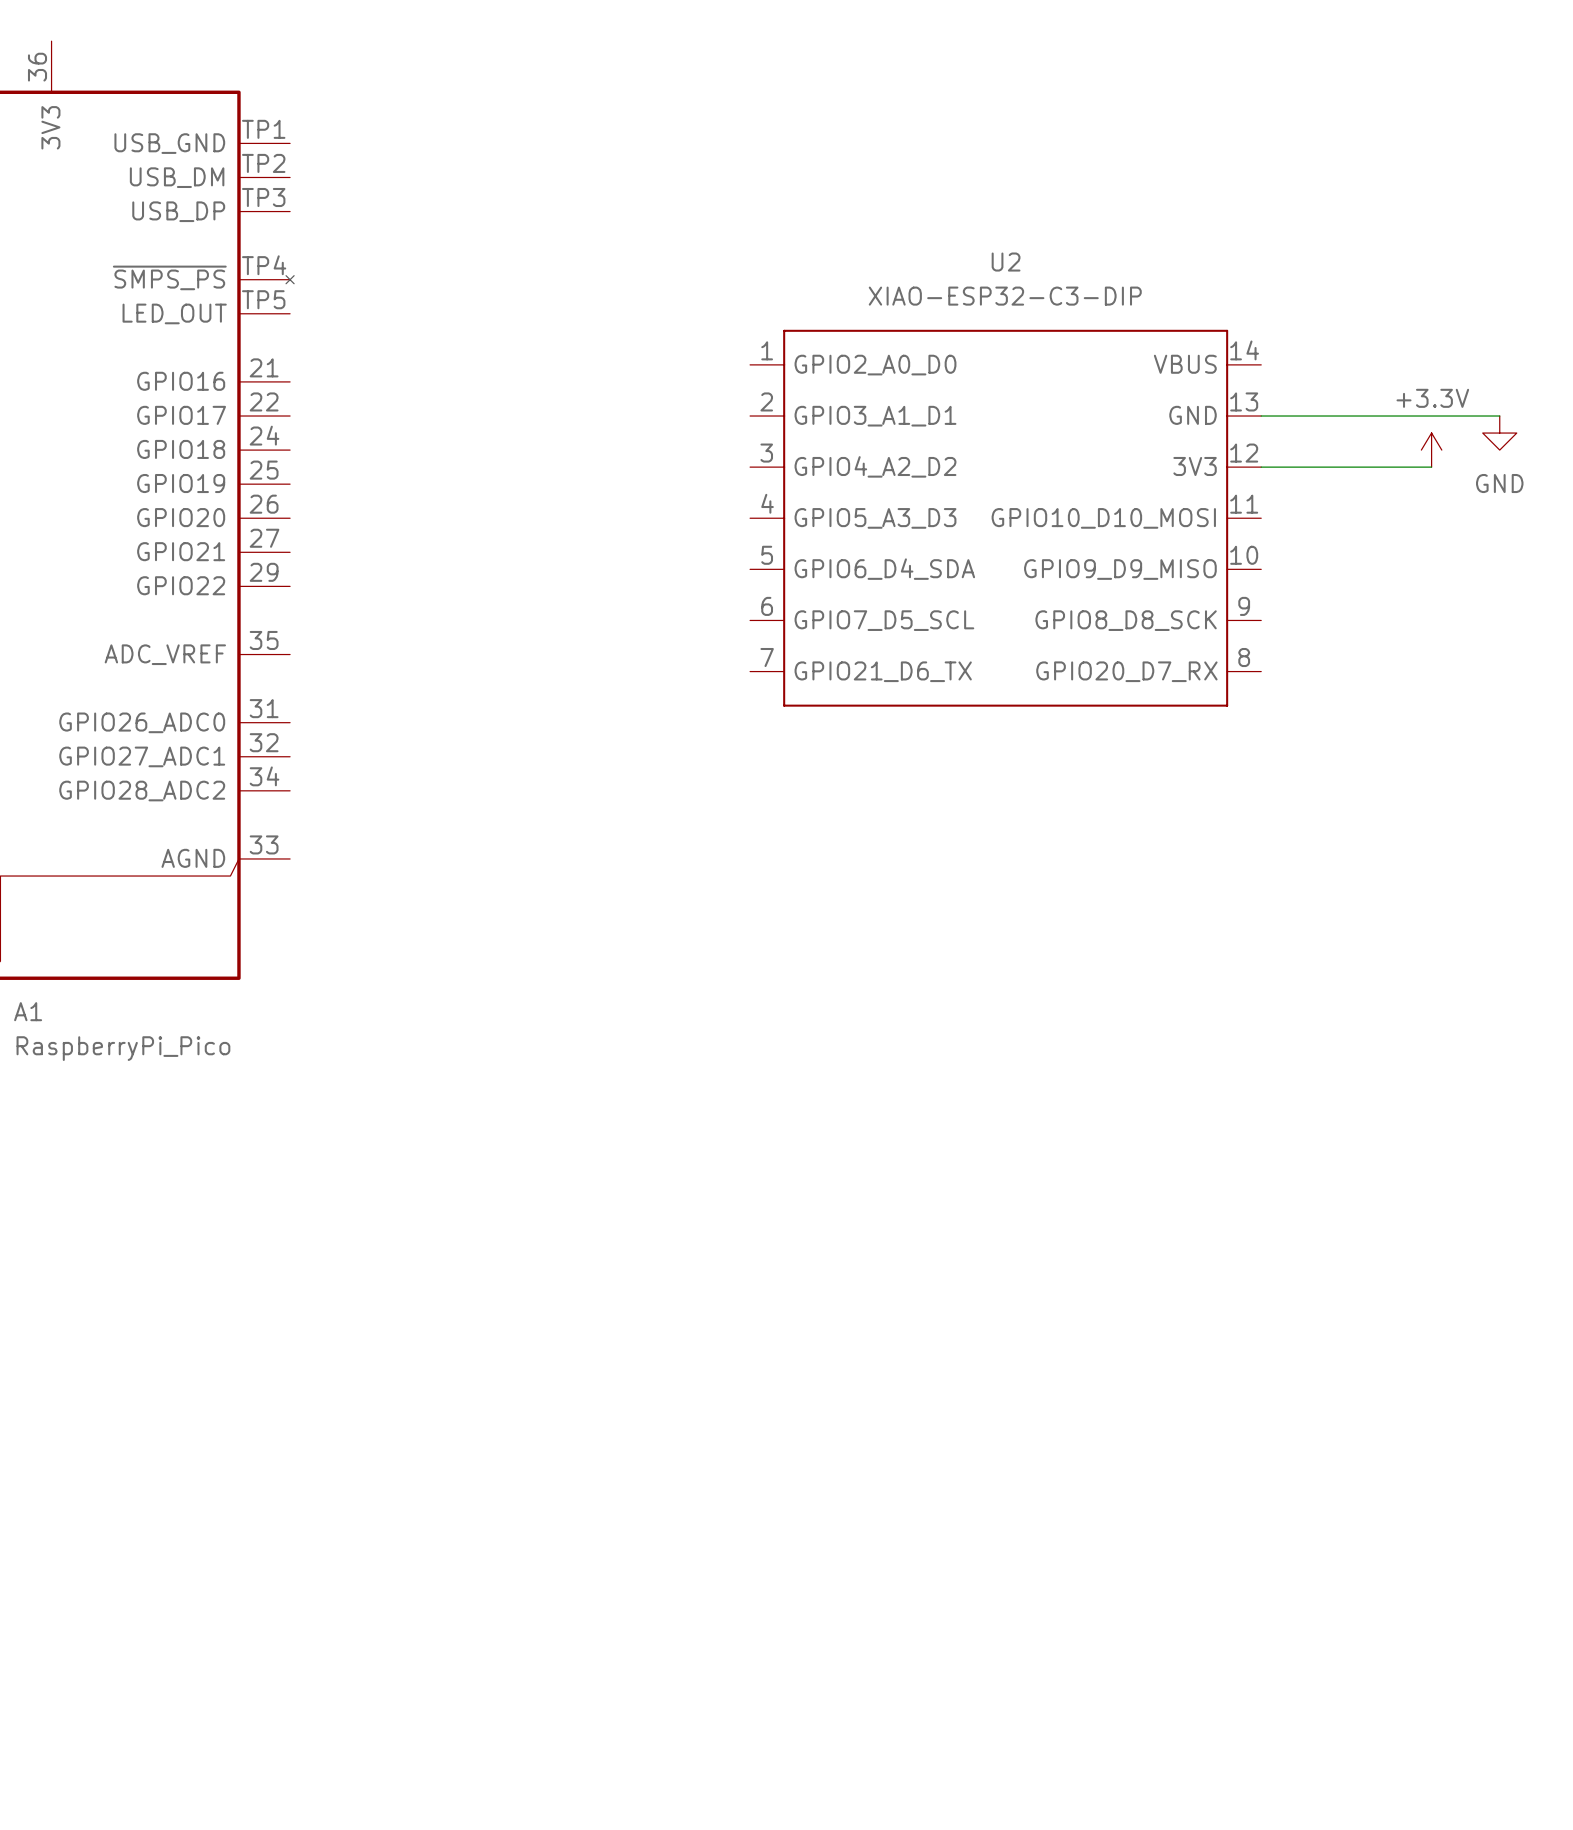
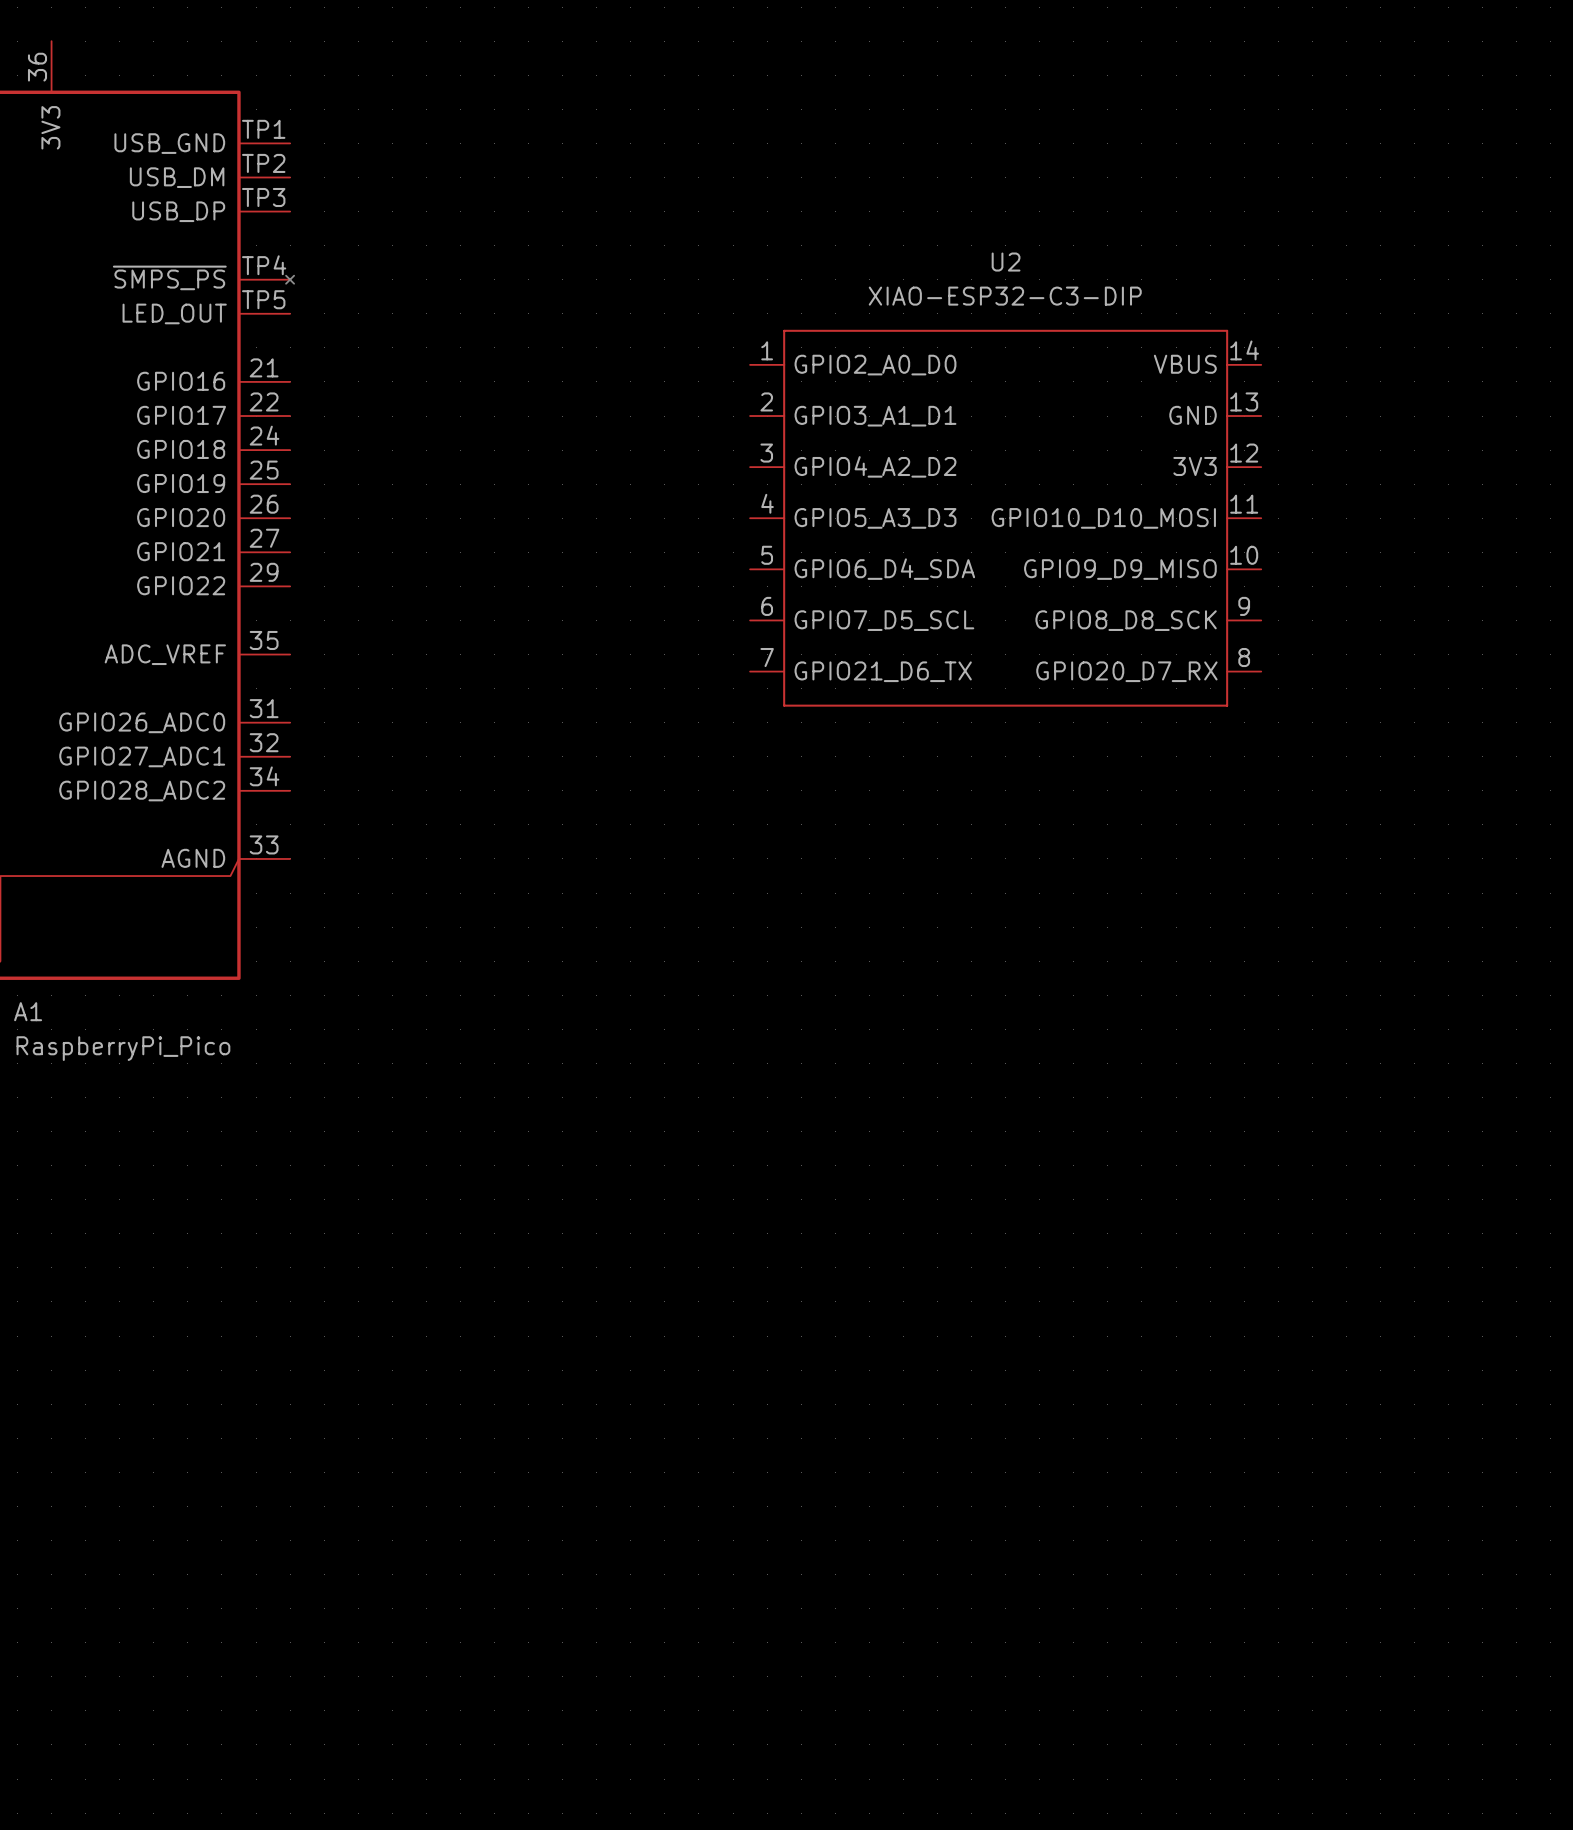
wire: (1261, 416) (1499, 416) -> none
power symbol: GND (1499, 433) -> none
power symbol: +3.3V (1431, 450) -> none
wire: (1261, 467) (1431, 467) -> none

